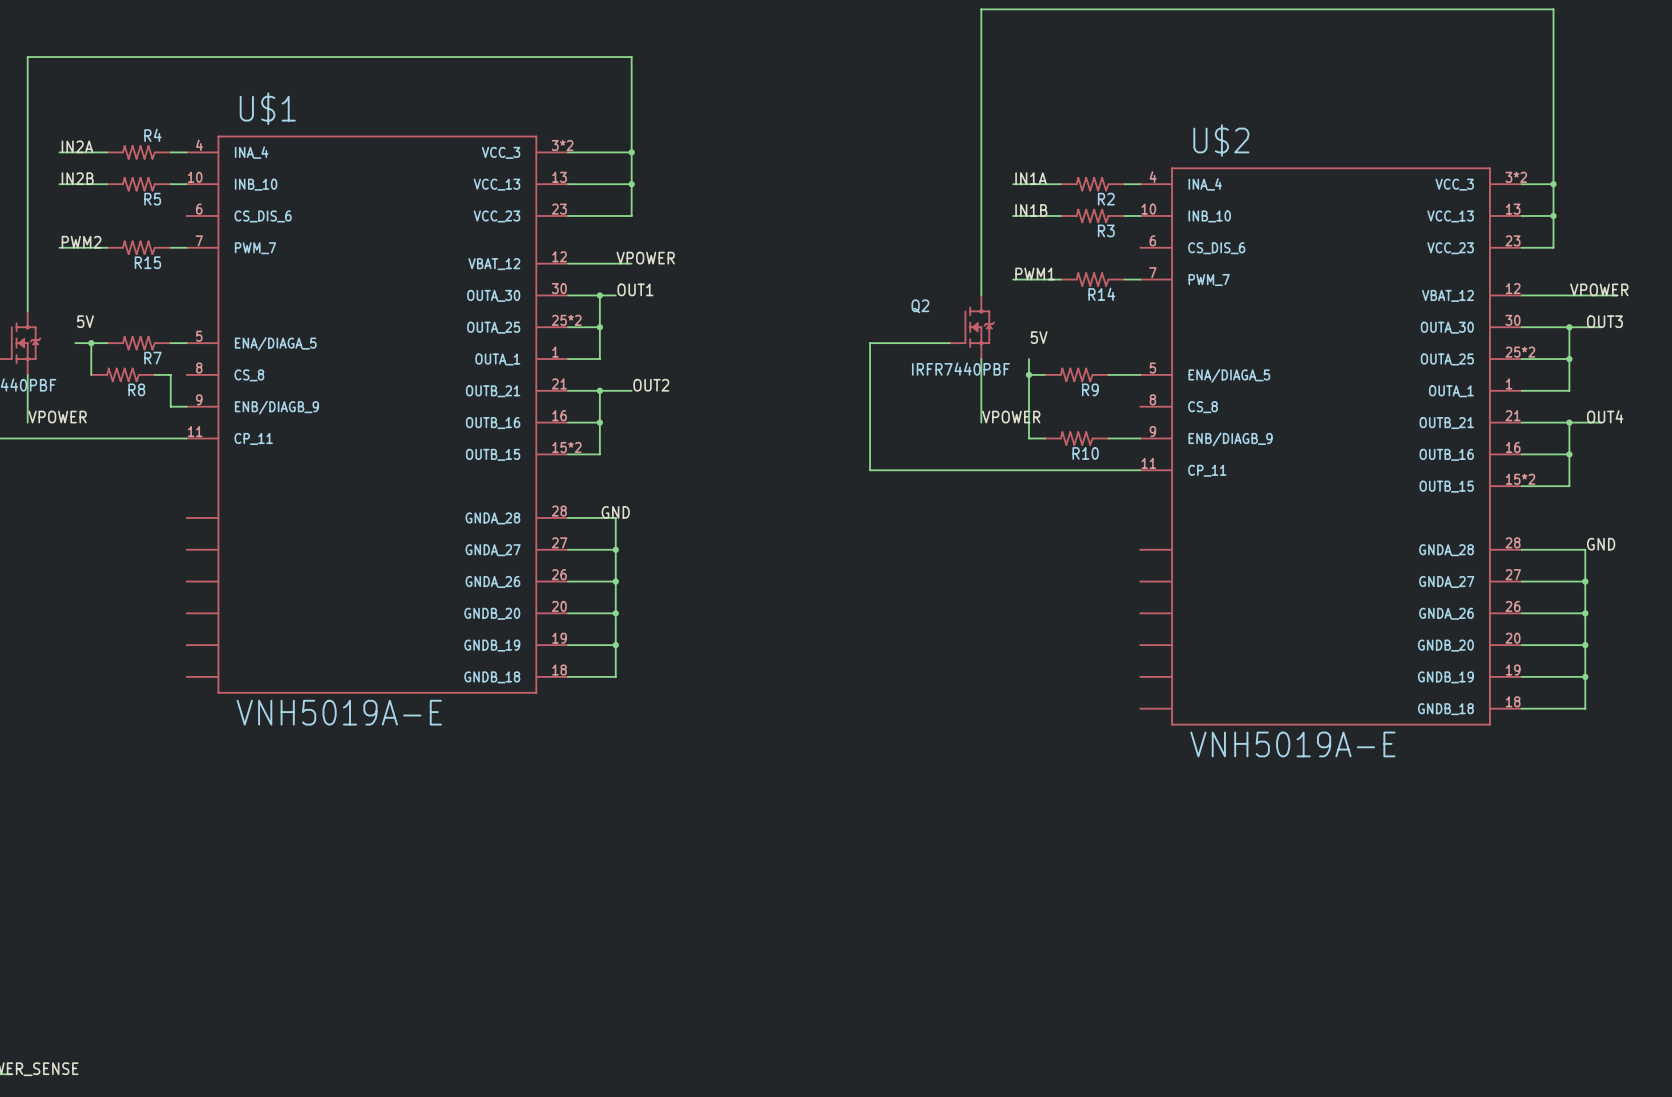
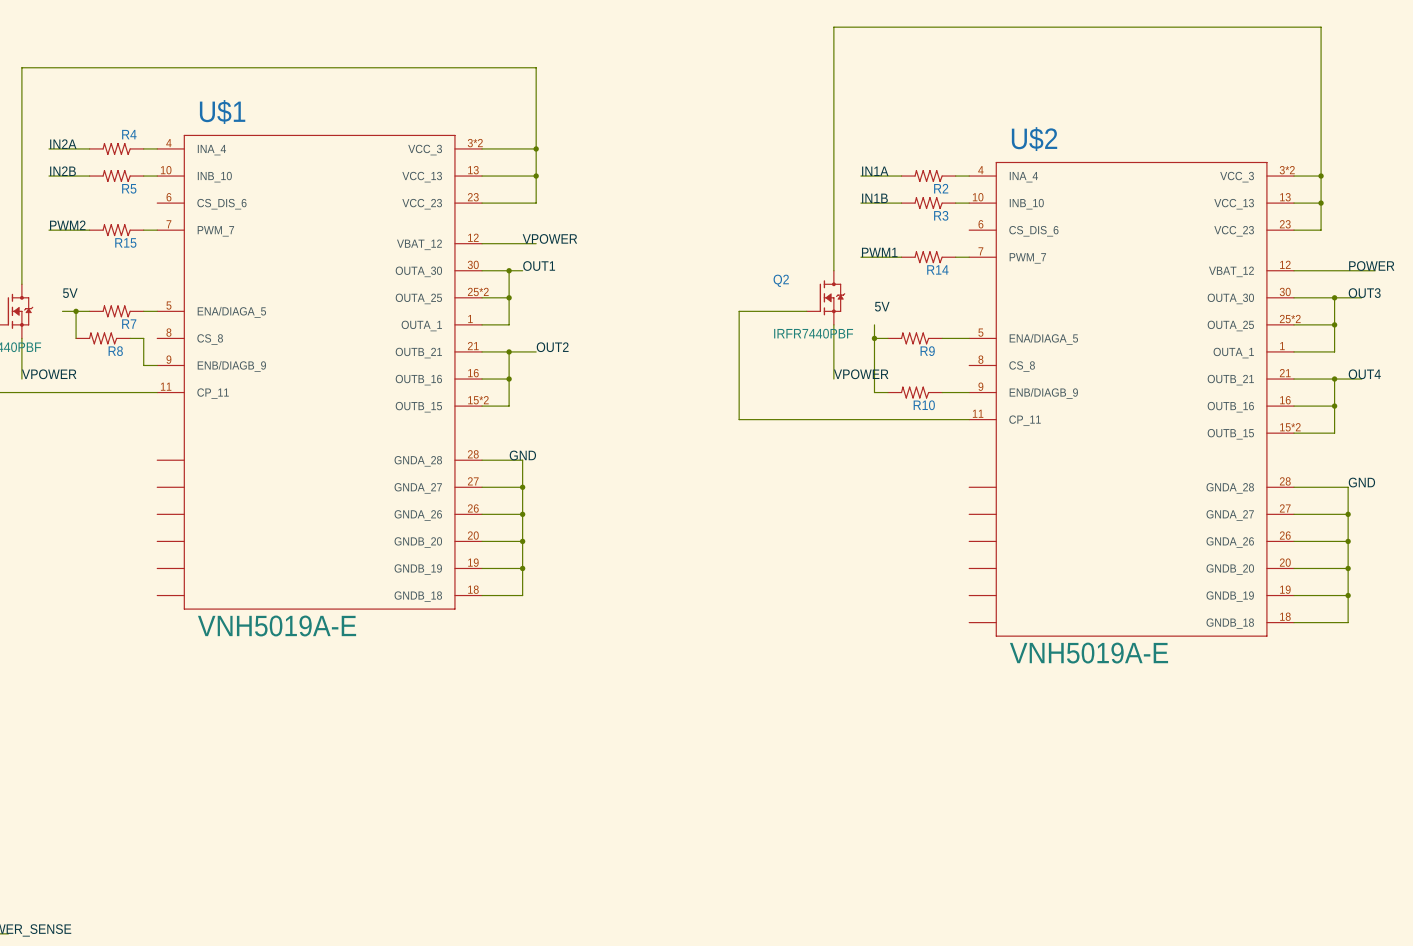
label: VPOWER (1599, 289) -> POWER (1371, 266)

